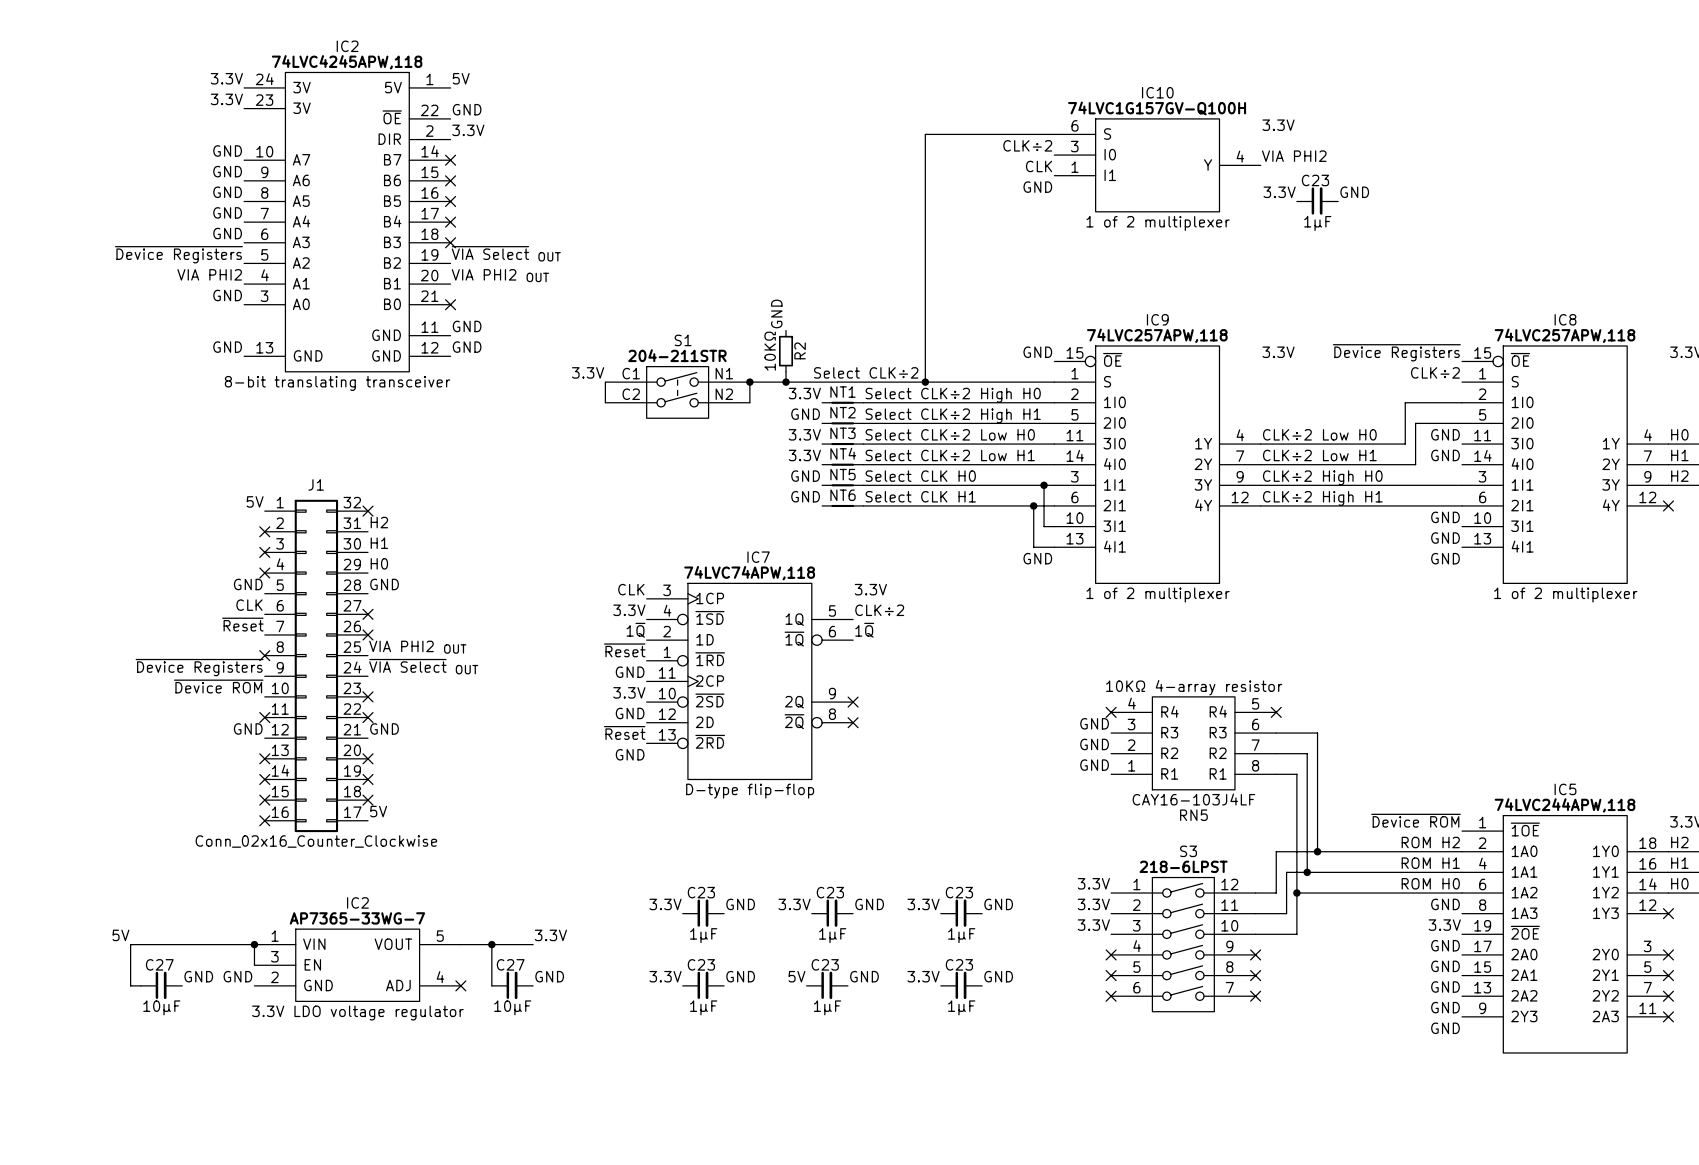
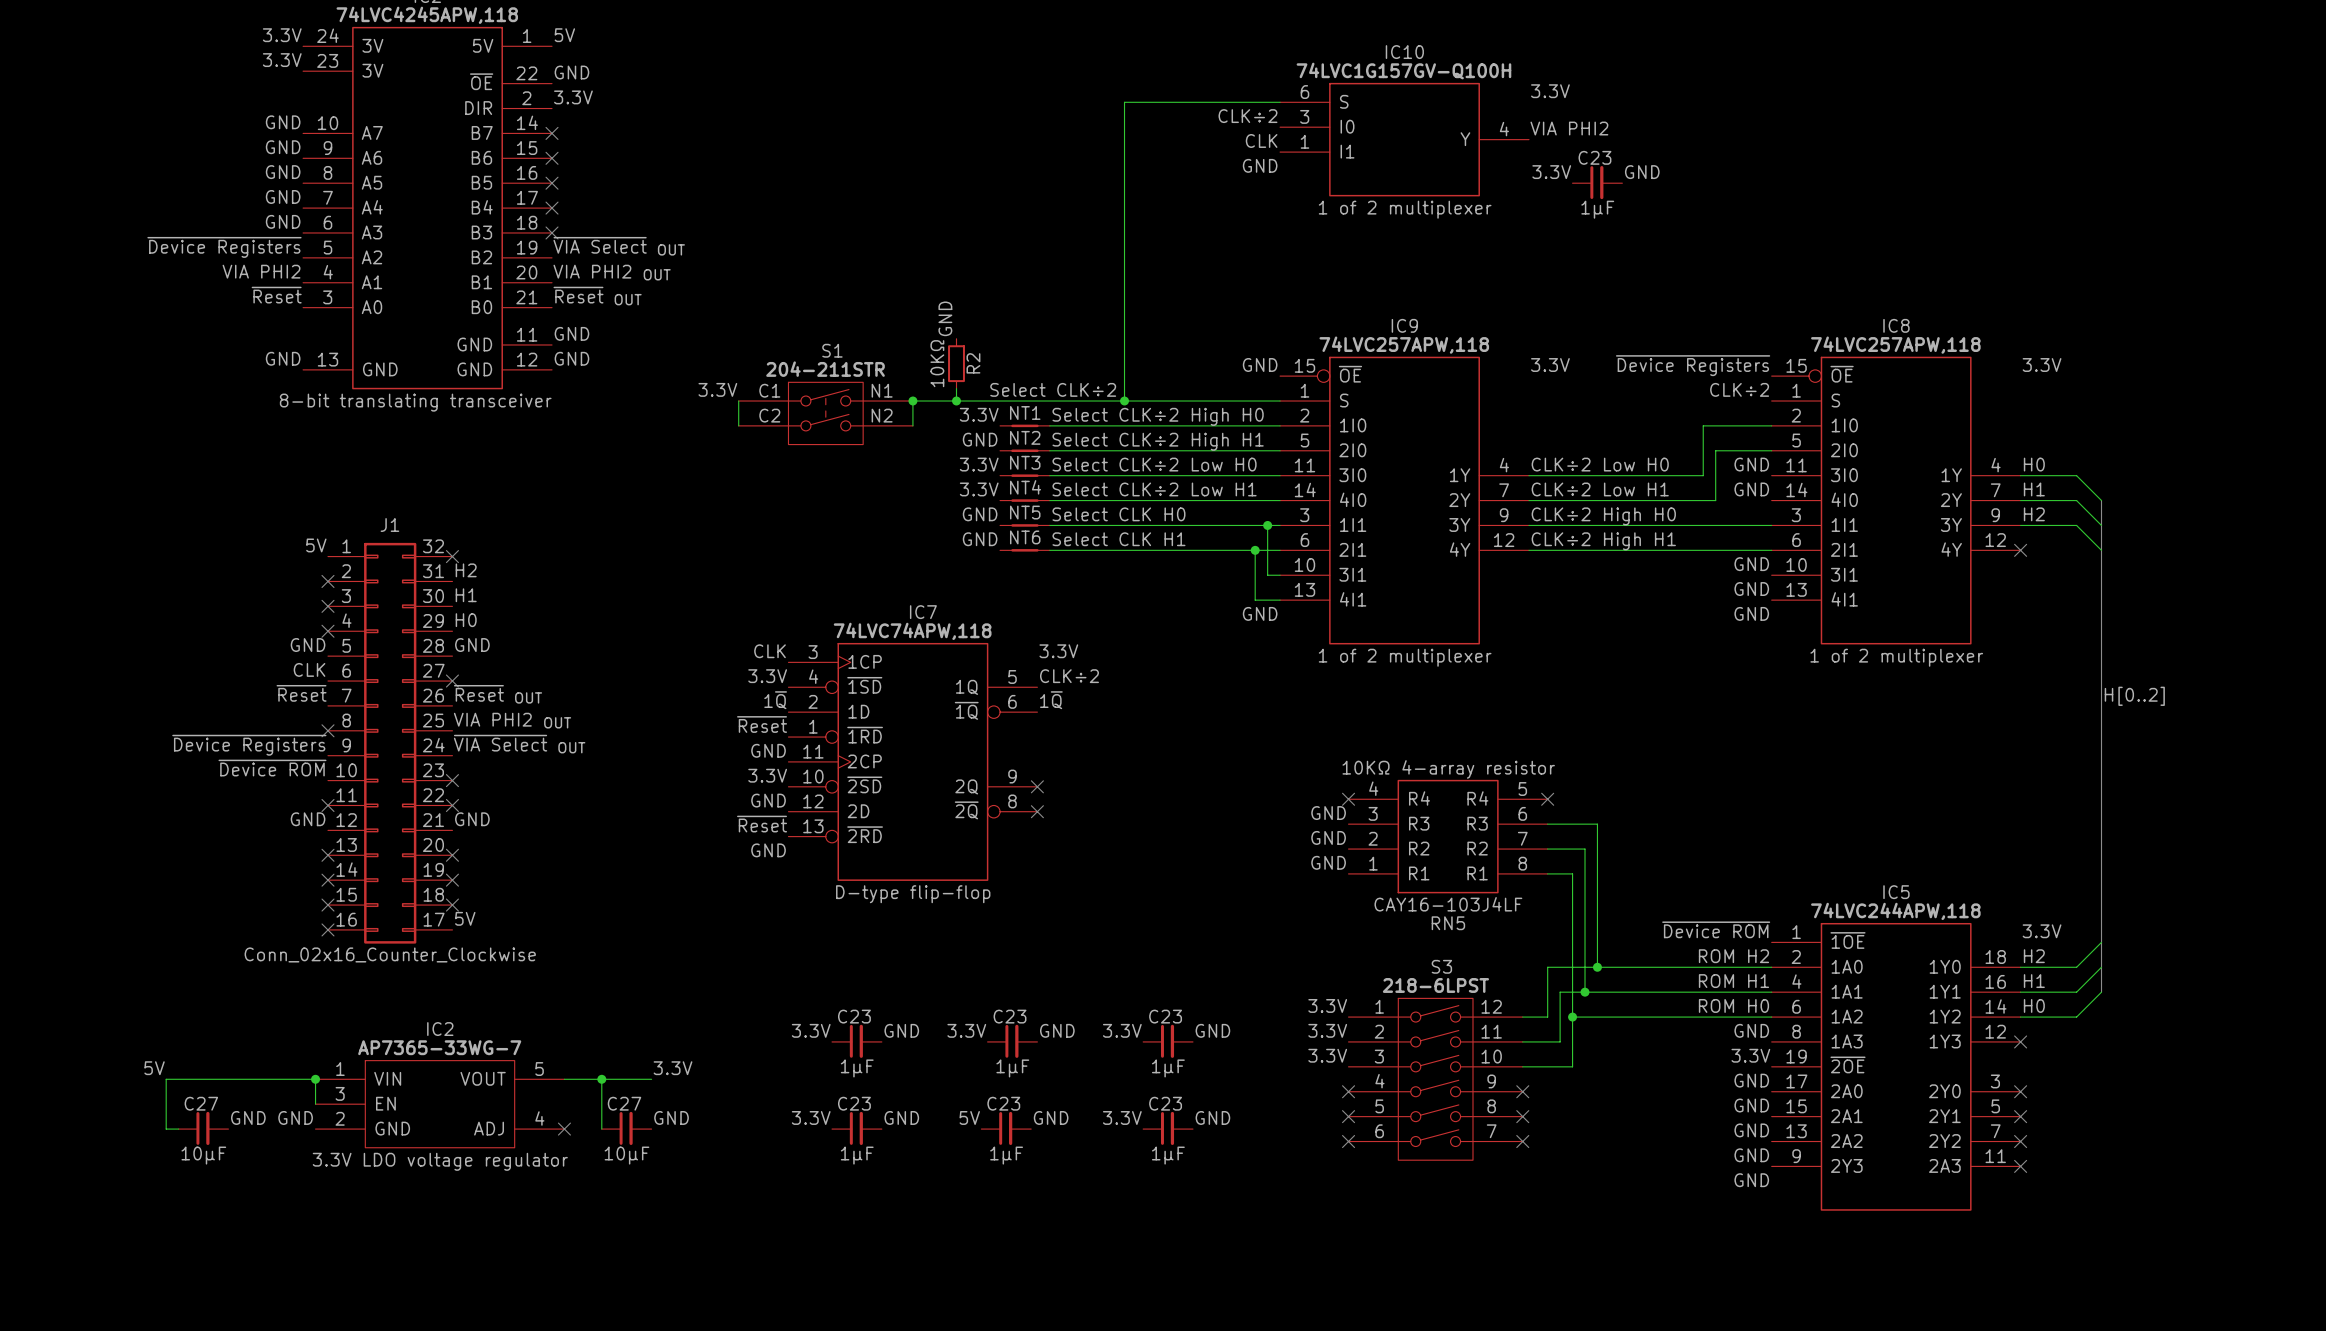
label: GND (227, 295) -> ~{Reset} (276, 295)
label: none -> ~{Reset} OUT (597, 296)
no-connect mark: (450, 304) -> none
label: none -> ~{Reset} OUT (498, 694)
no-connect mark: (367, 634) -> none

